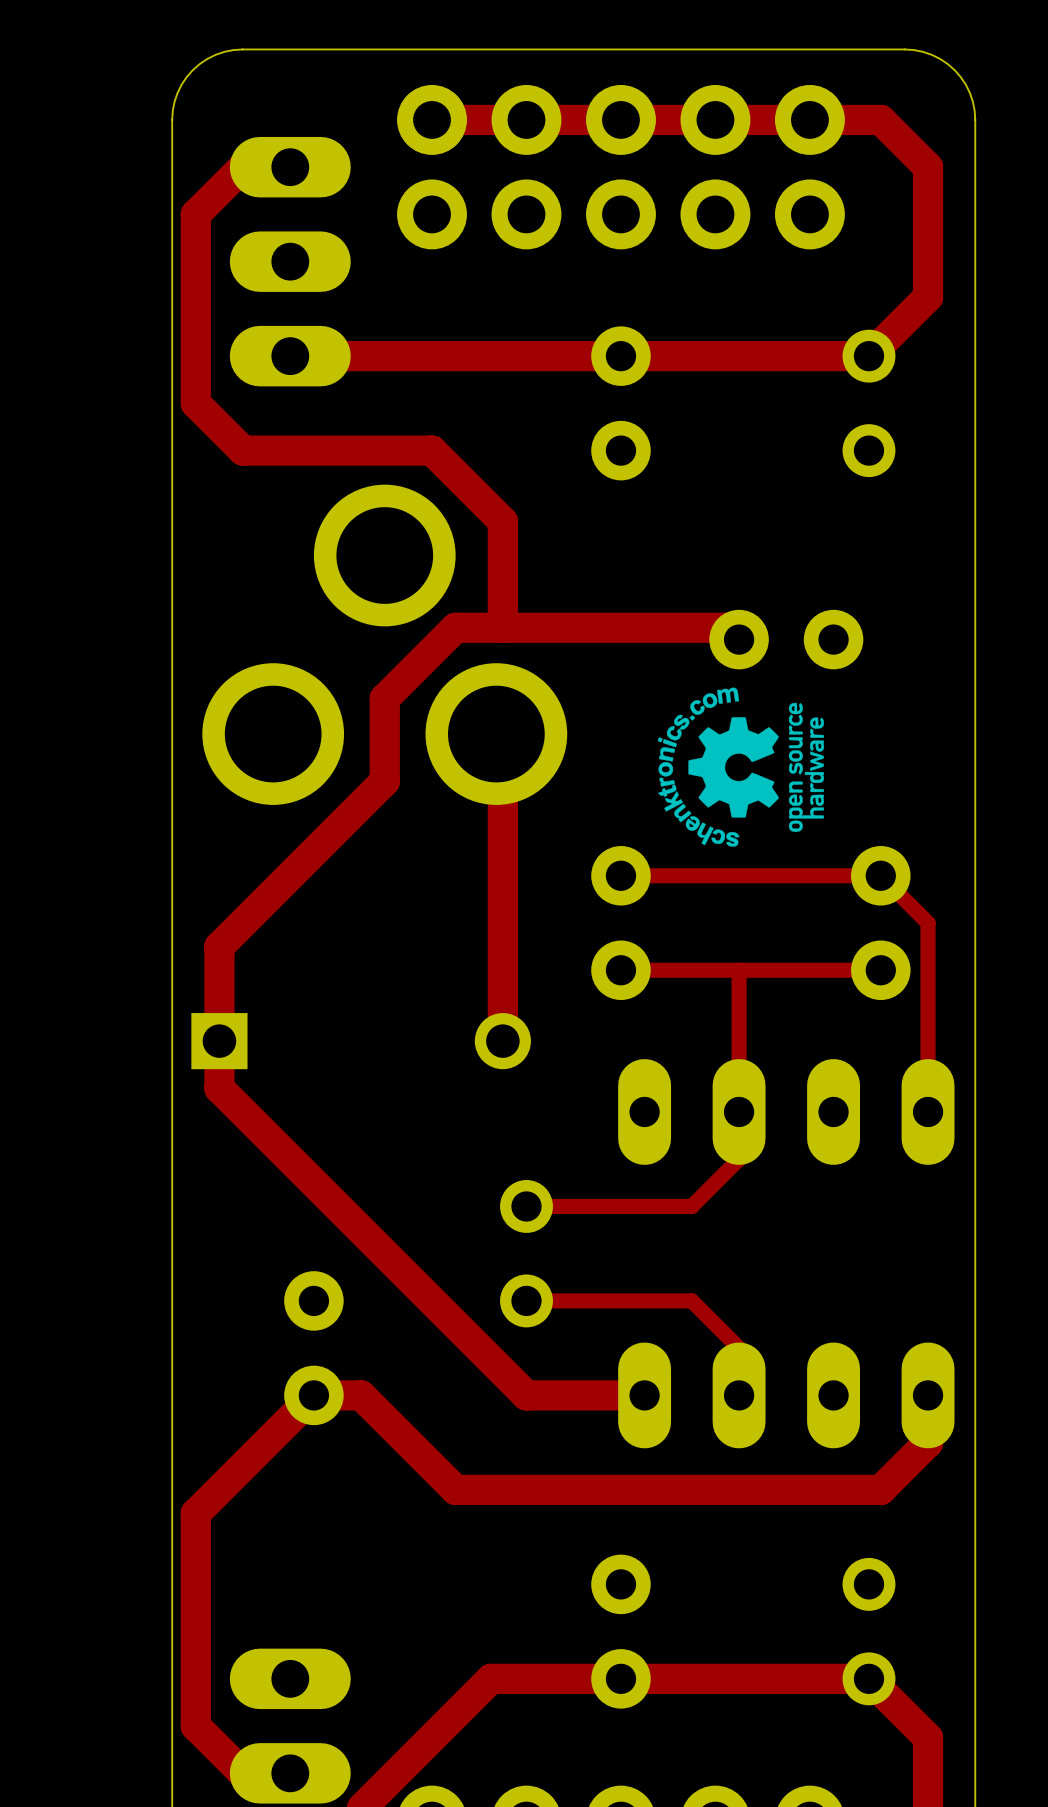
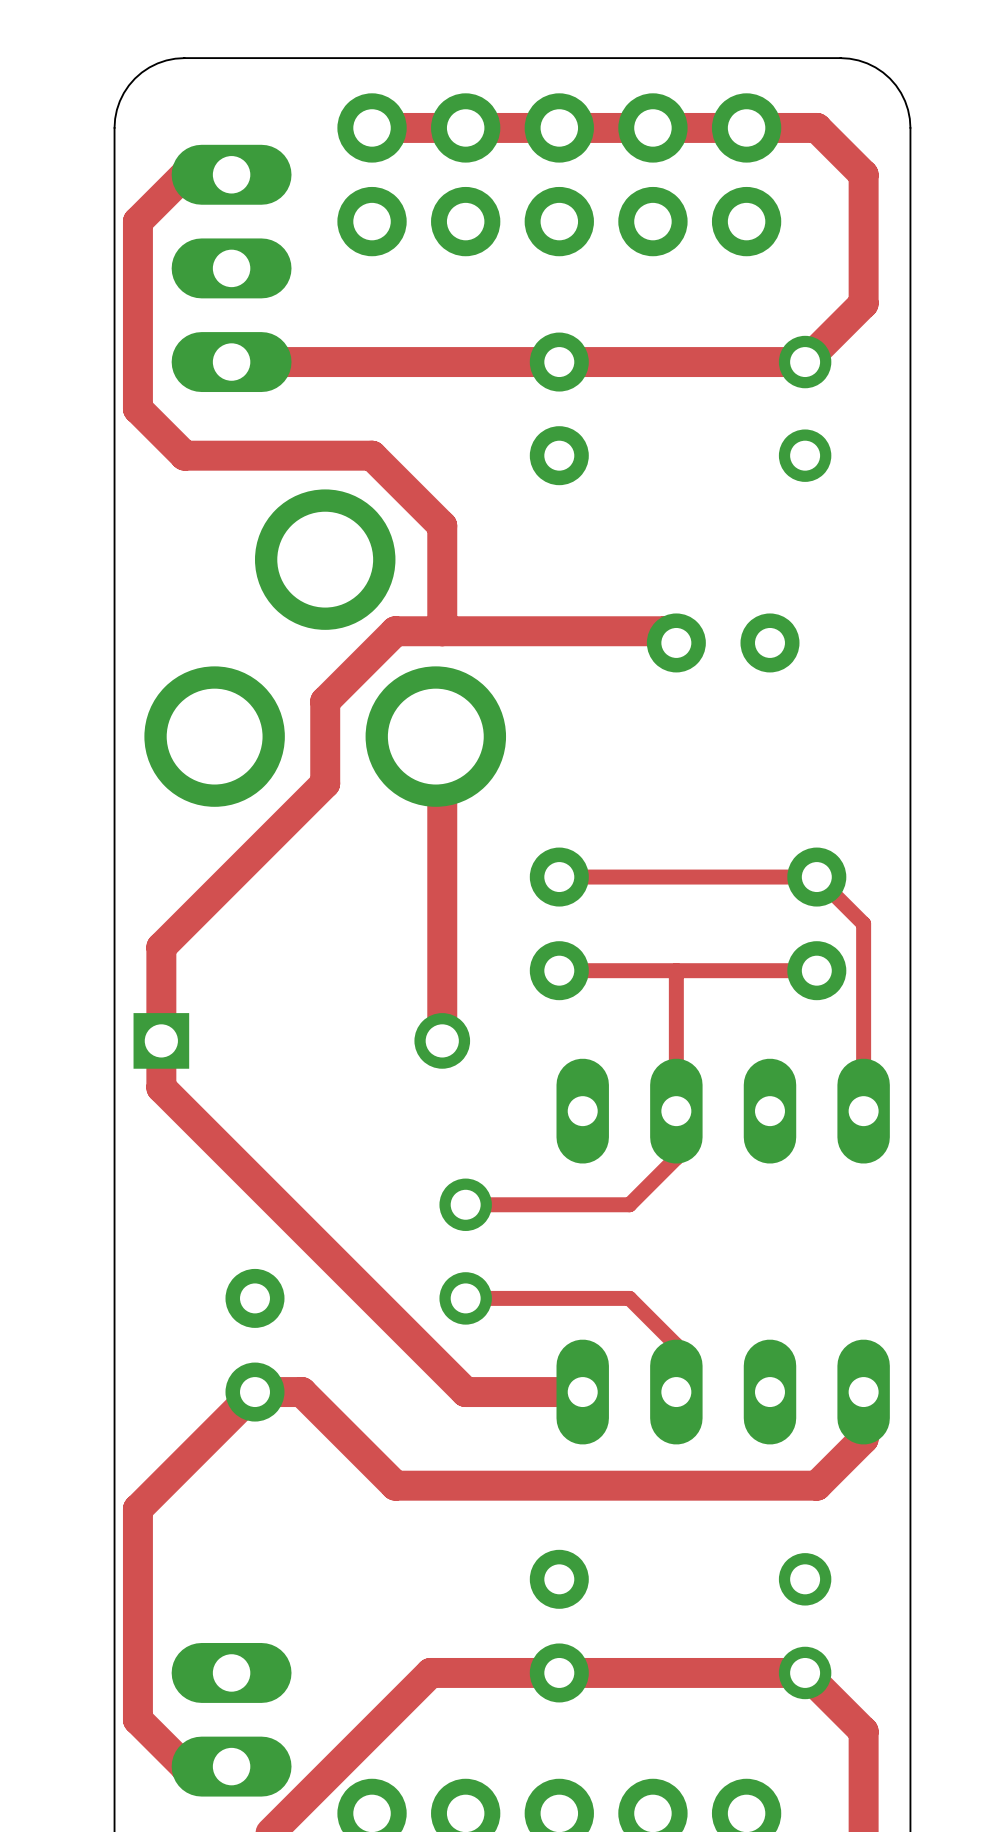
drawing: [657, 687, 825, 847] -> none

